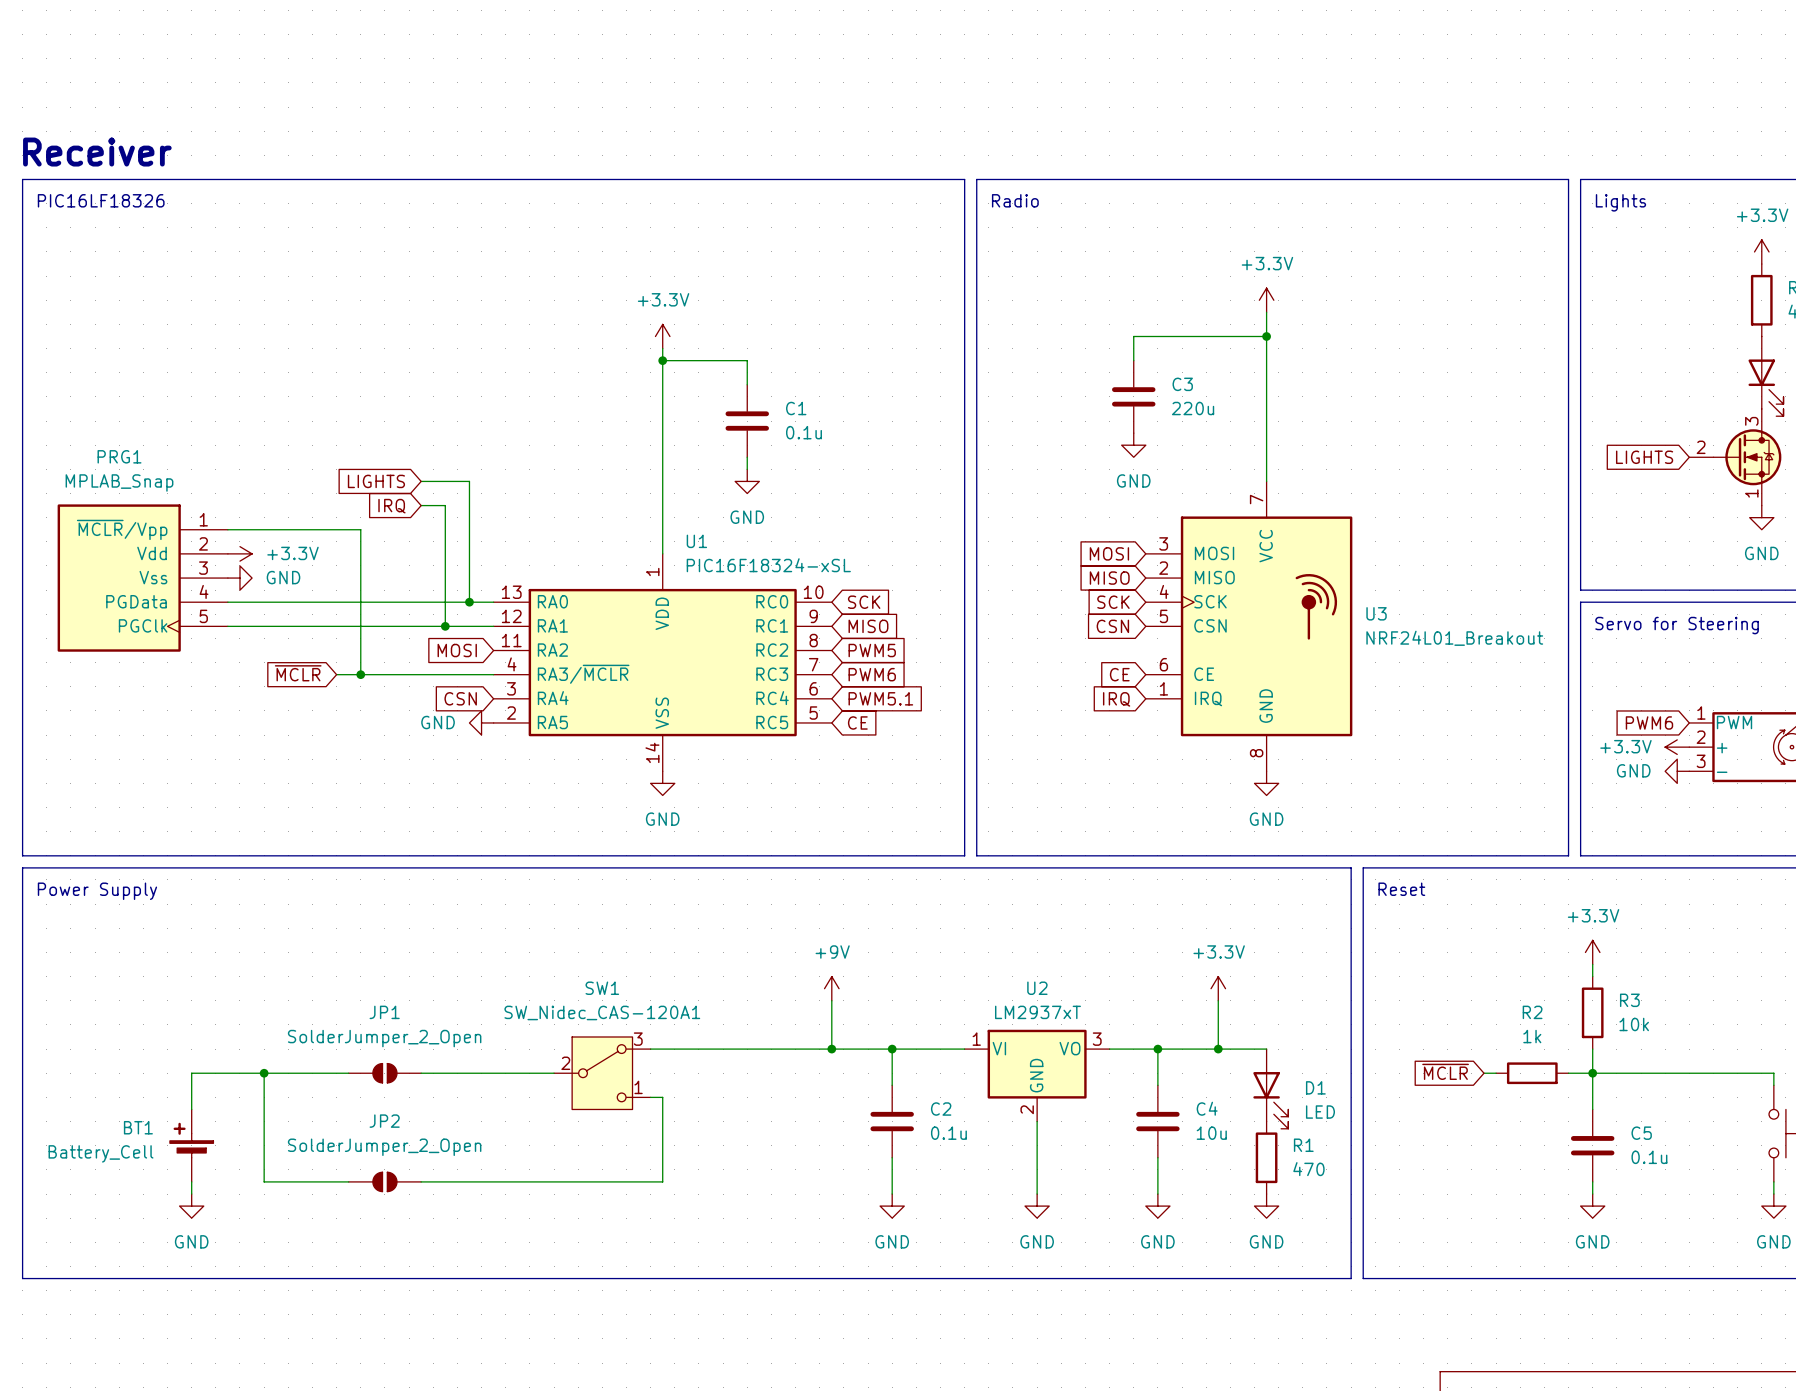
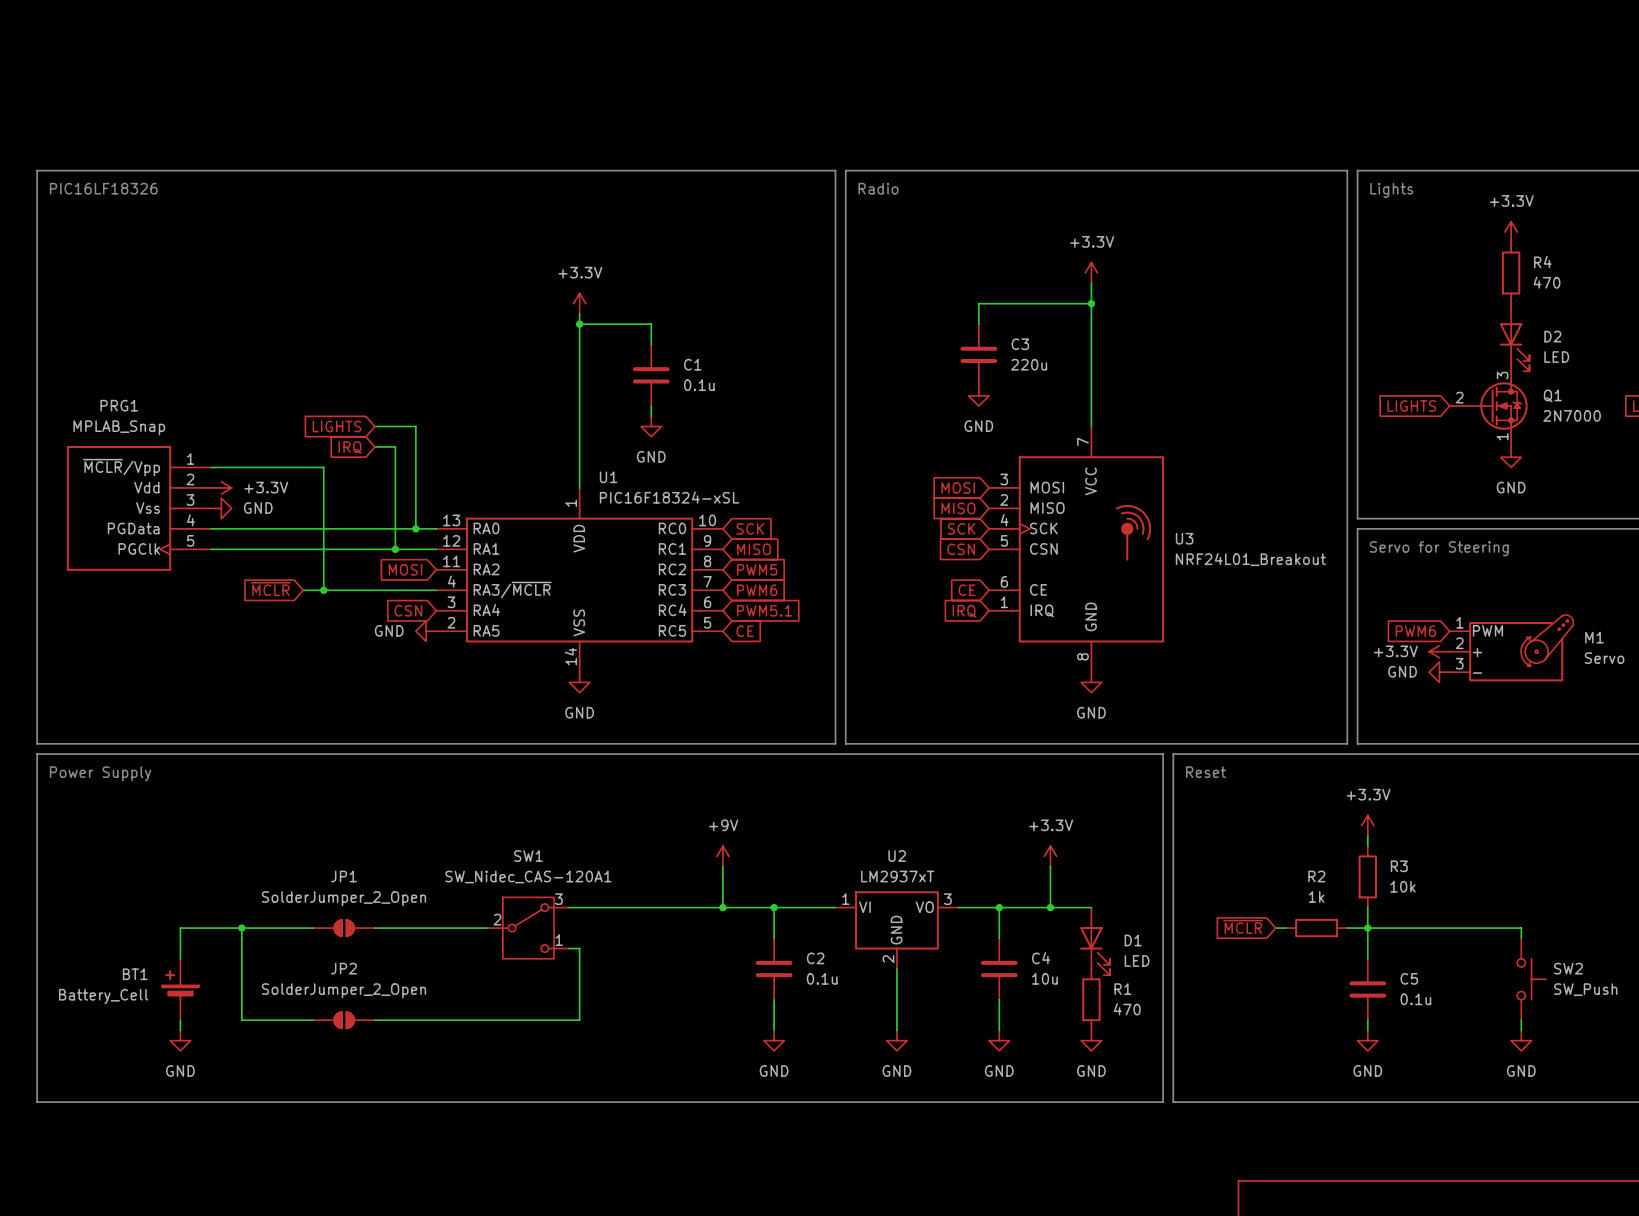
text: Receiver (97, 152) -> none

